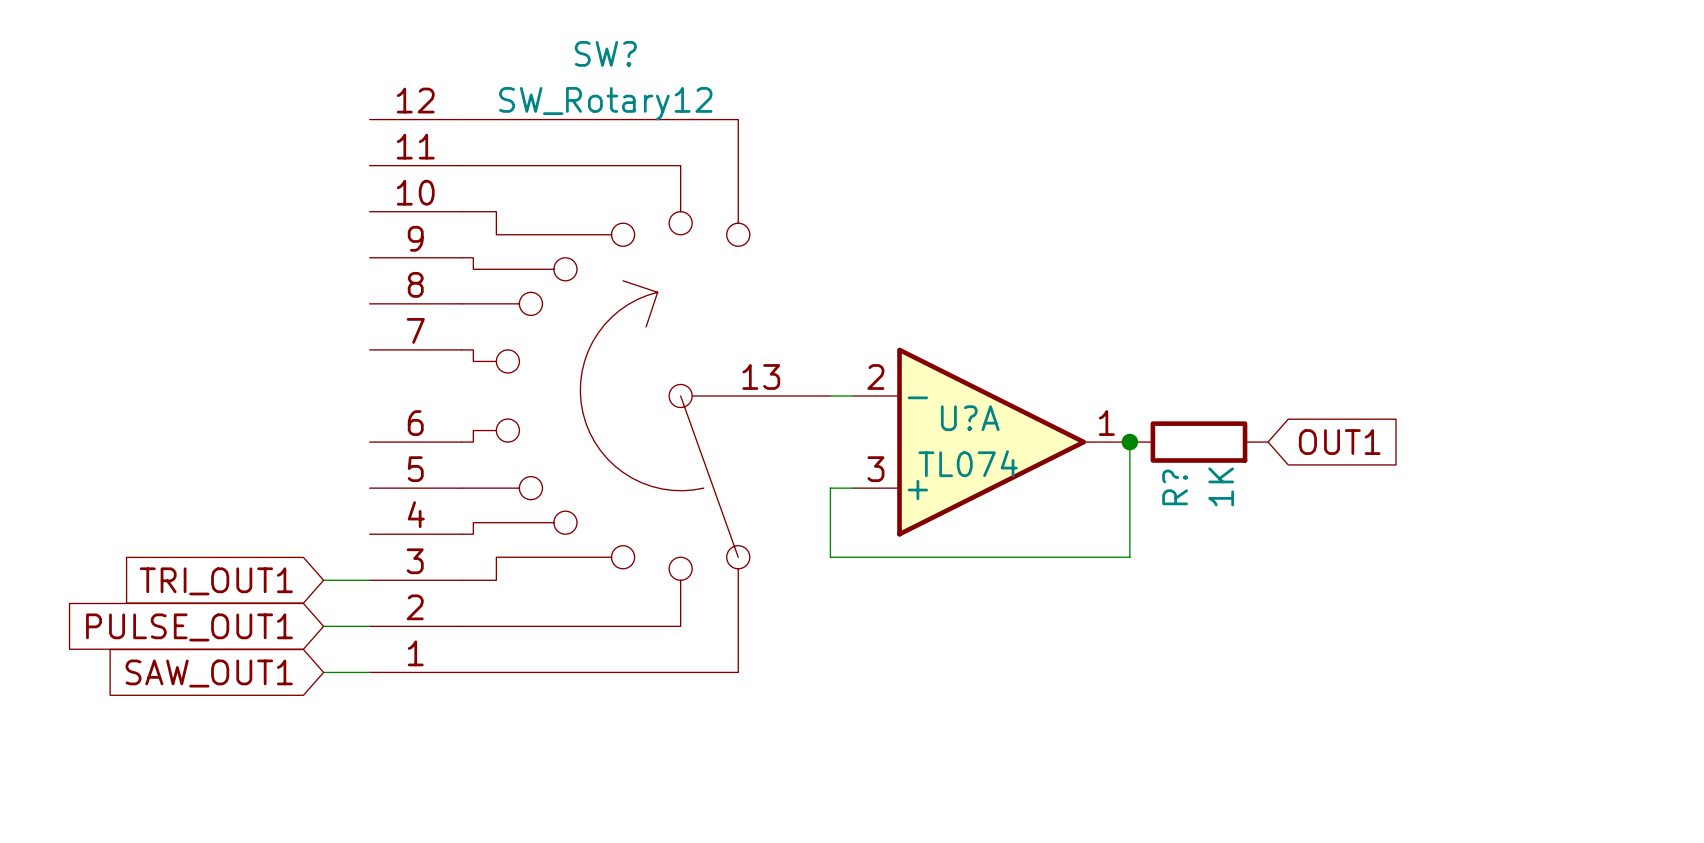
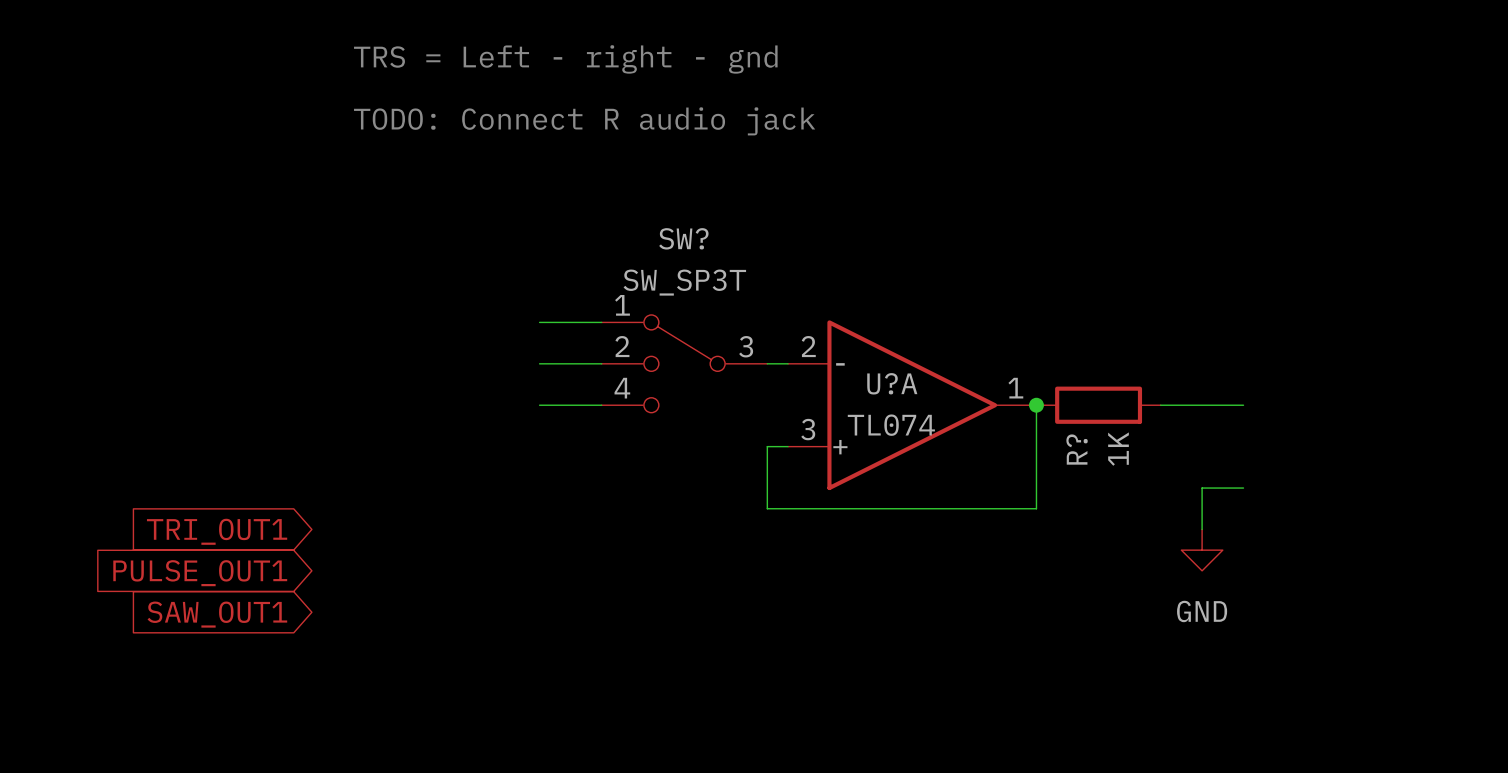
text: none -> TRS = Left - right - gnd (565, 59)
text: none -> TODO: Connect R audio jack (584, 121)
wire: none -> (539, 322) (601, 322)
wire: none -> (539, 363) (601, 363)
SW?: SW_Rotary12 (600, 395) -> none
SW?: none -> SW_SP3T (684, 363)
wire: none -> (539, 405) (601, 405)
wire: none -> (1160, 405) (1243, 405)
global label: OUT1 (1339, 442) -> none
wire: none -> (1243, 488) (1202, 488) (1202, 529)
wire: (323, 580) (369, 580) -> none
power symbol: none -> GND (1202, 550)
wire: (323, 626) (369, 626) -> none
wire: (323, 672) (369, 672) -> none

